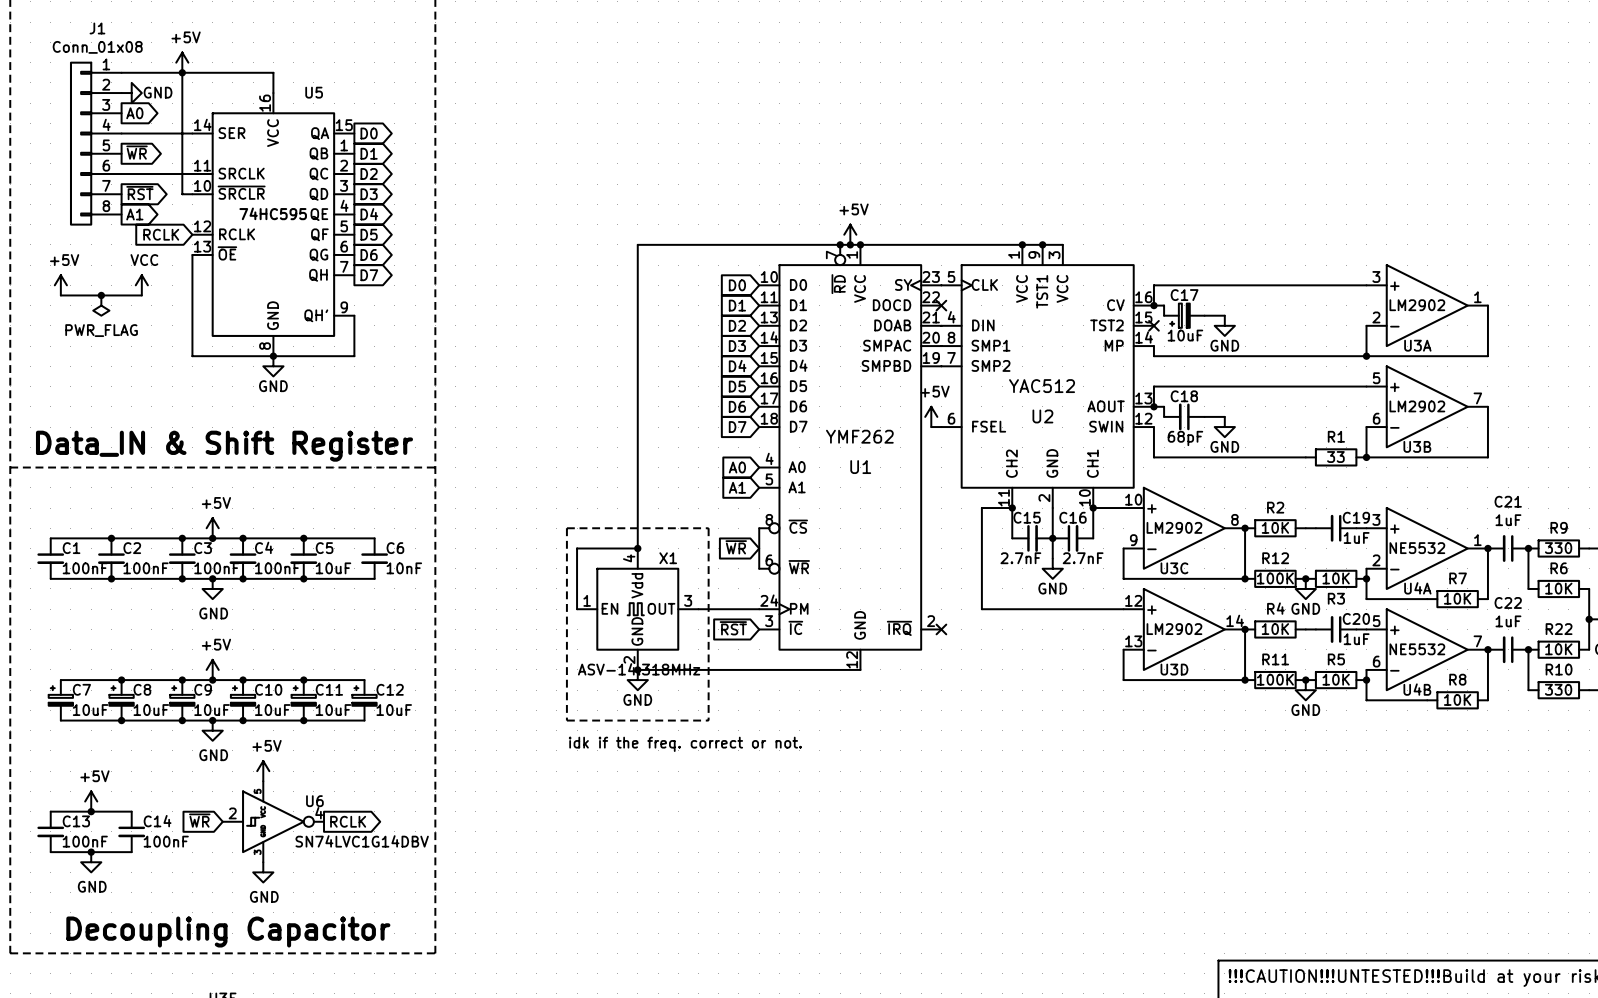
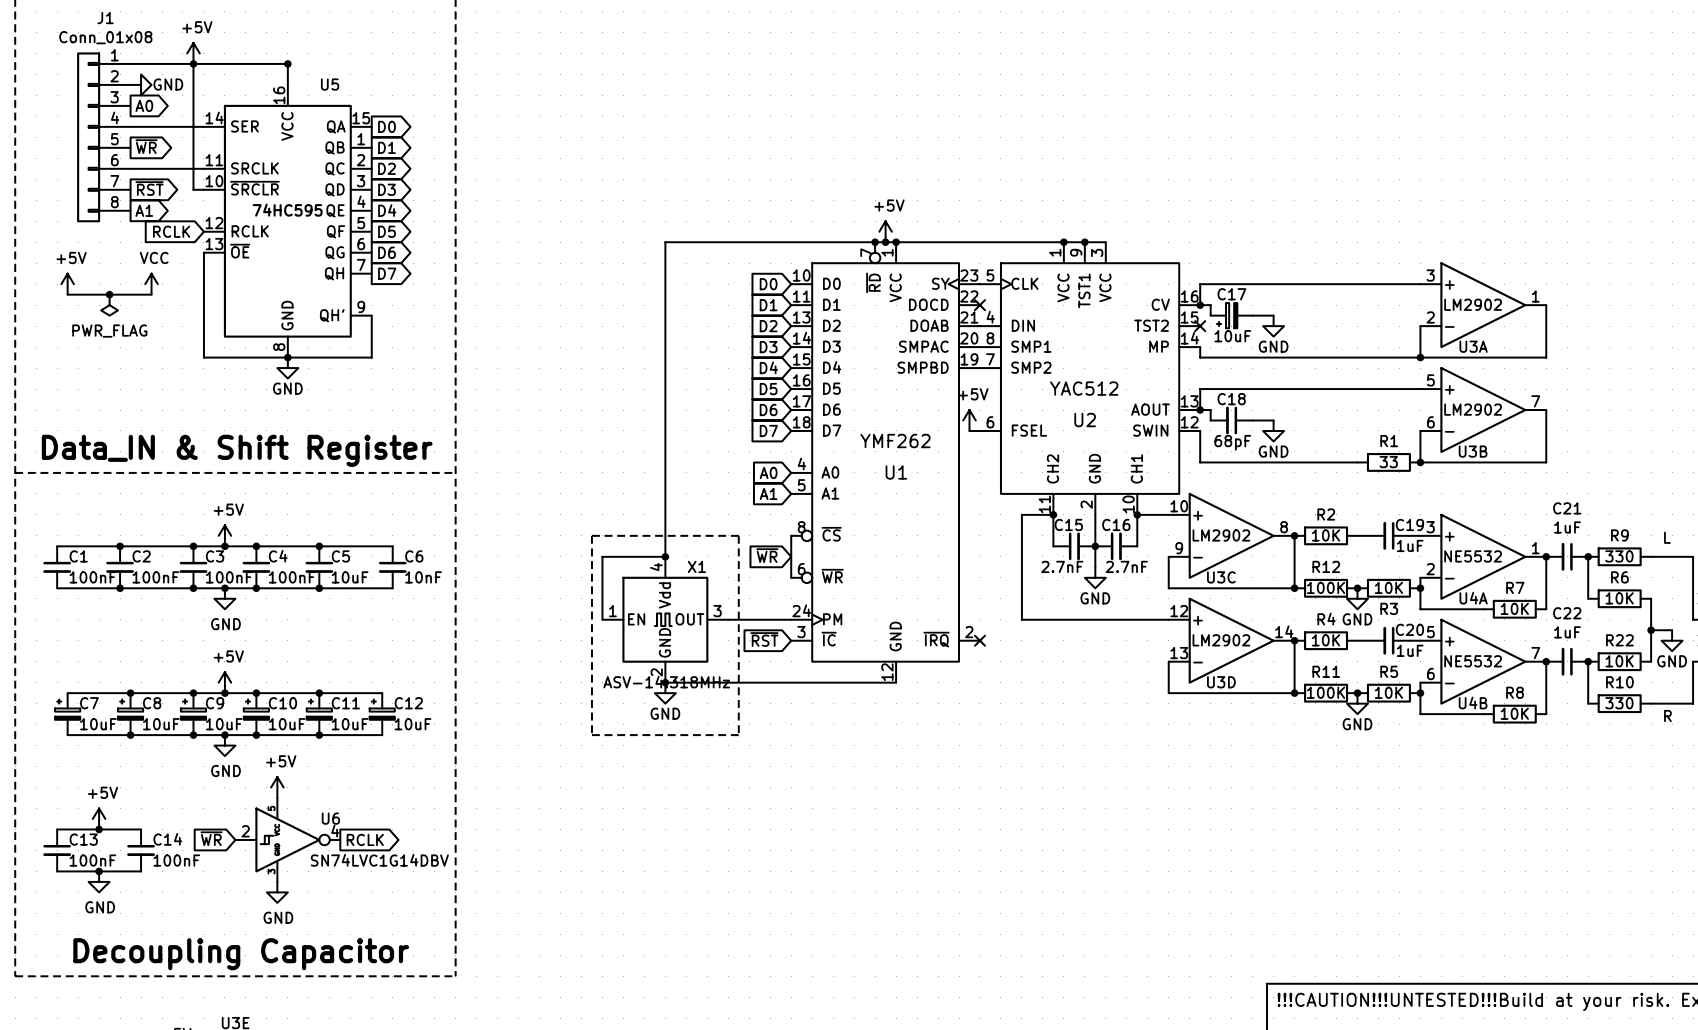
junction: none -> (287, 63)
text: idk if the freq. correct or not. (685, 744) -> none

